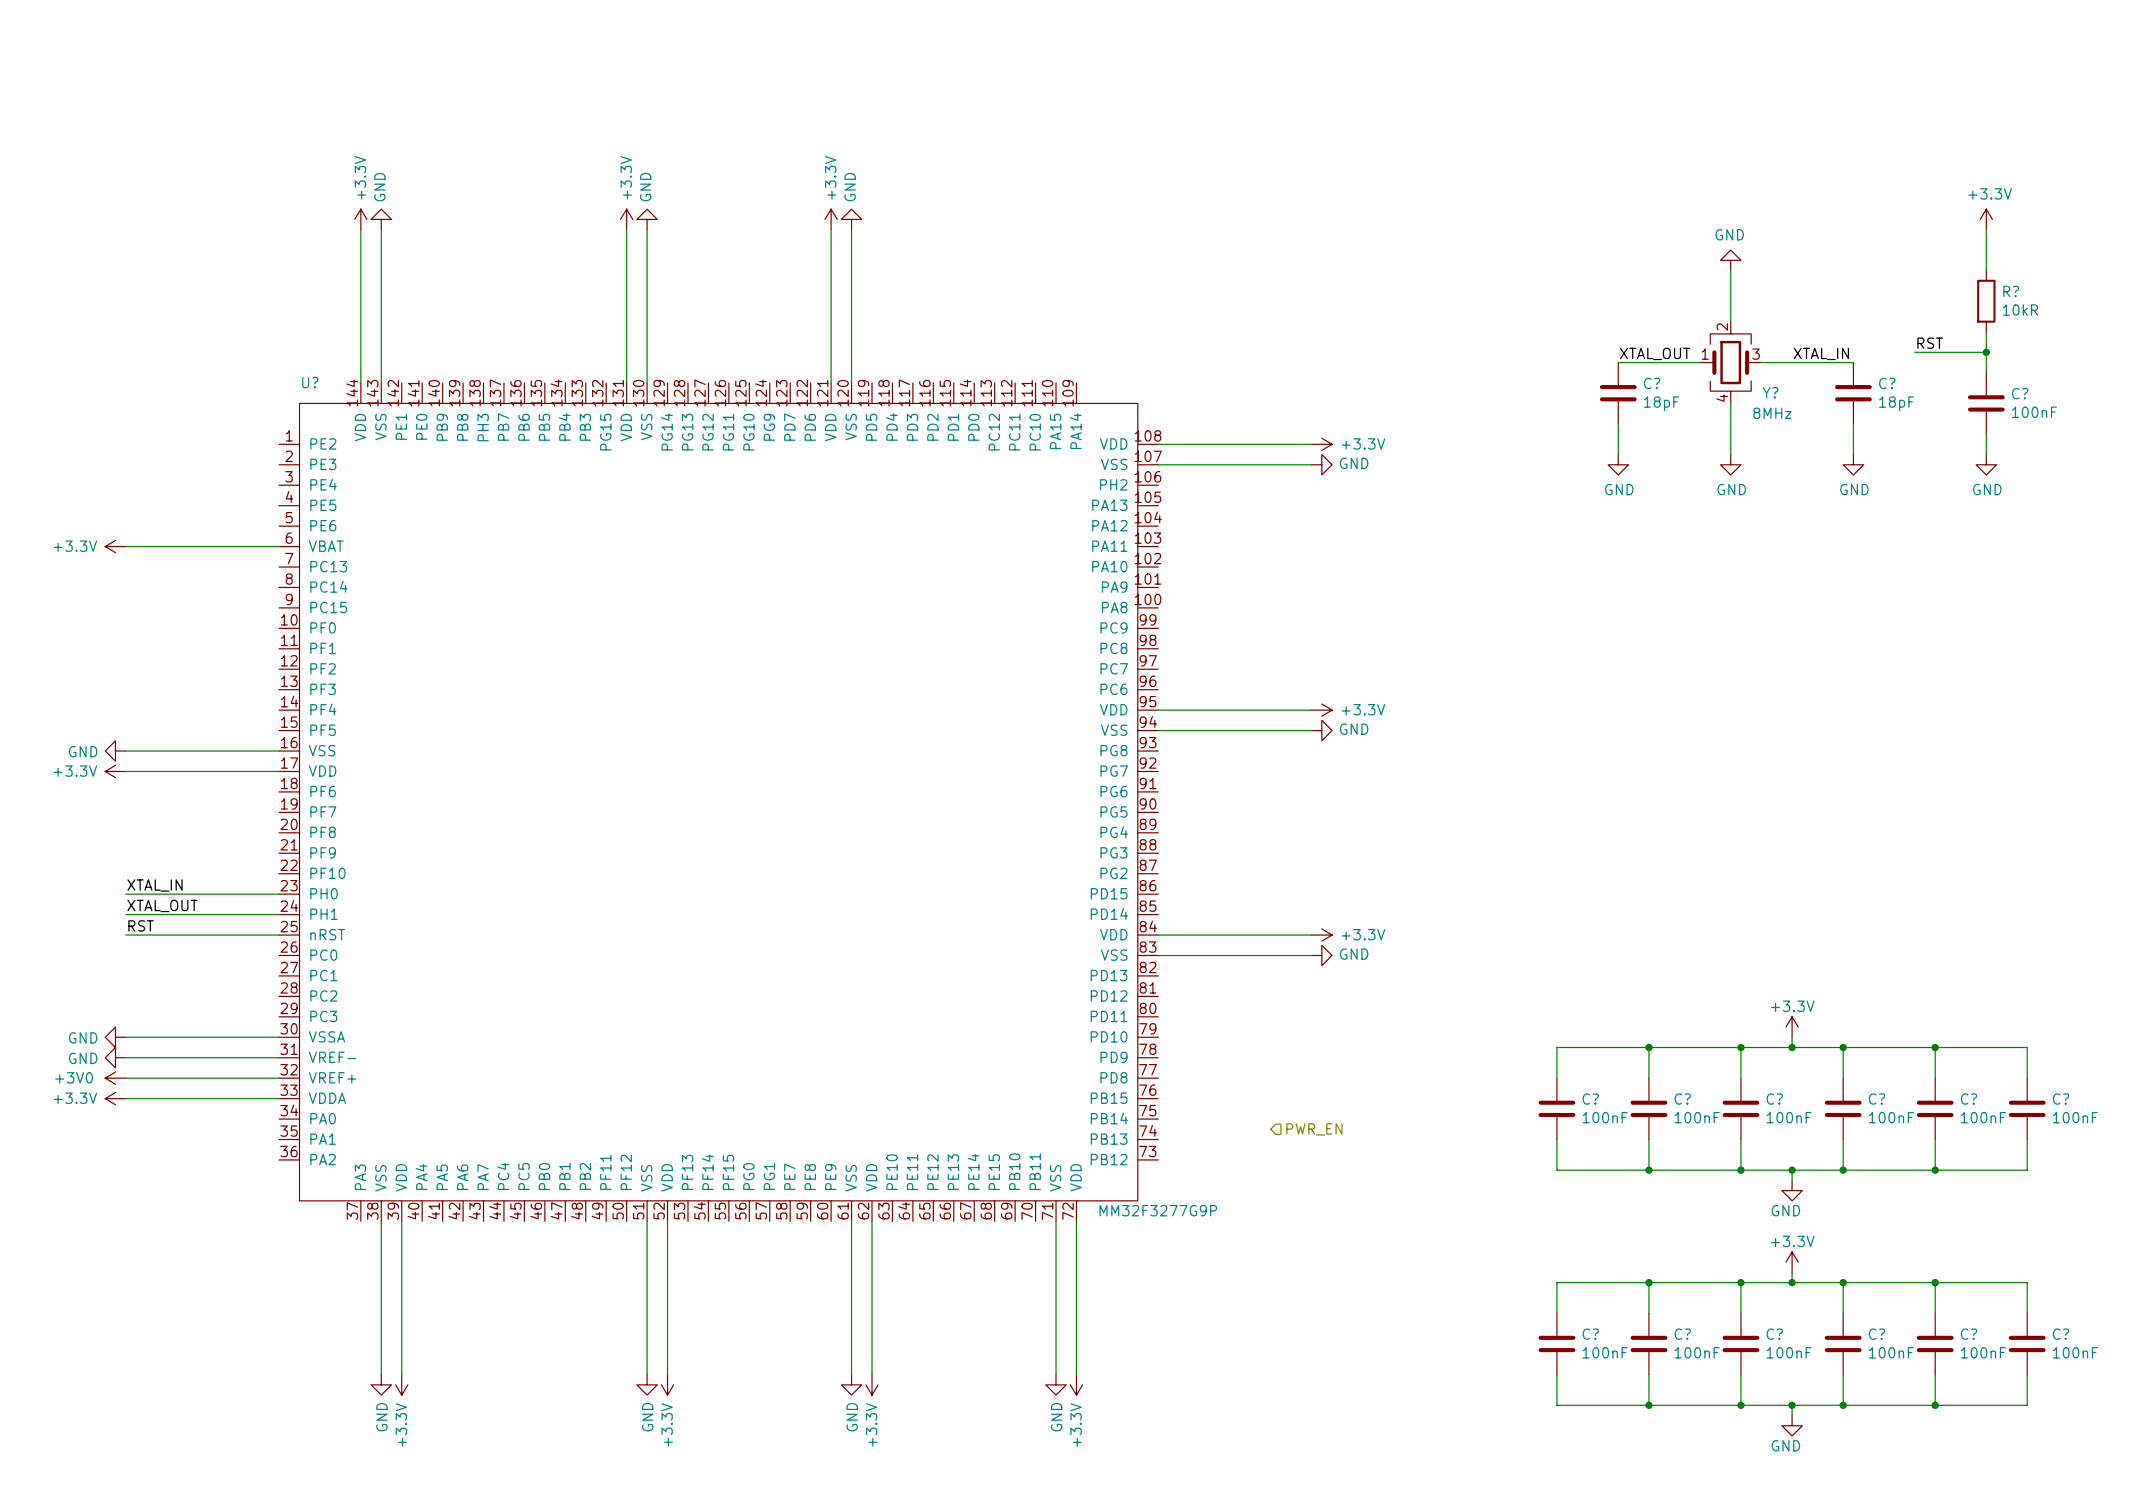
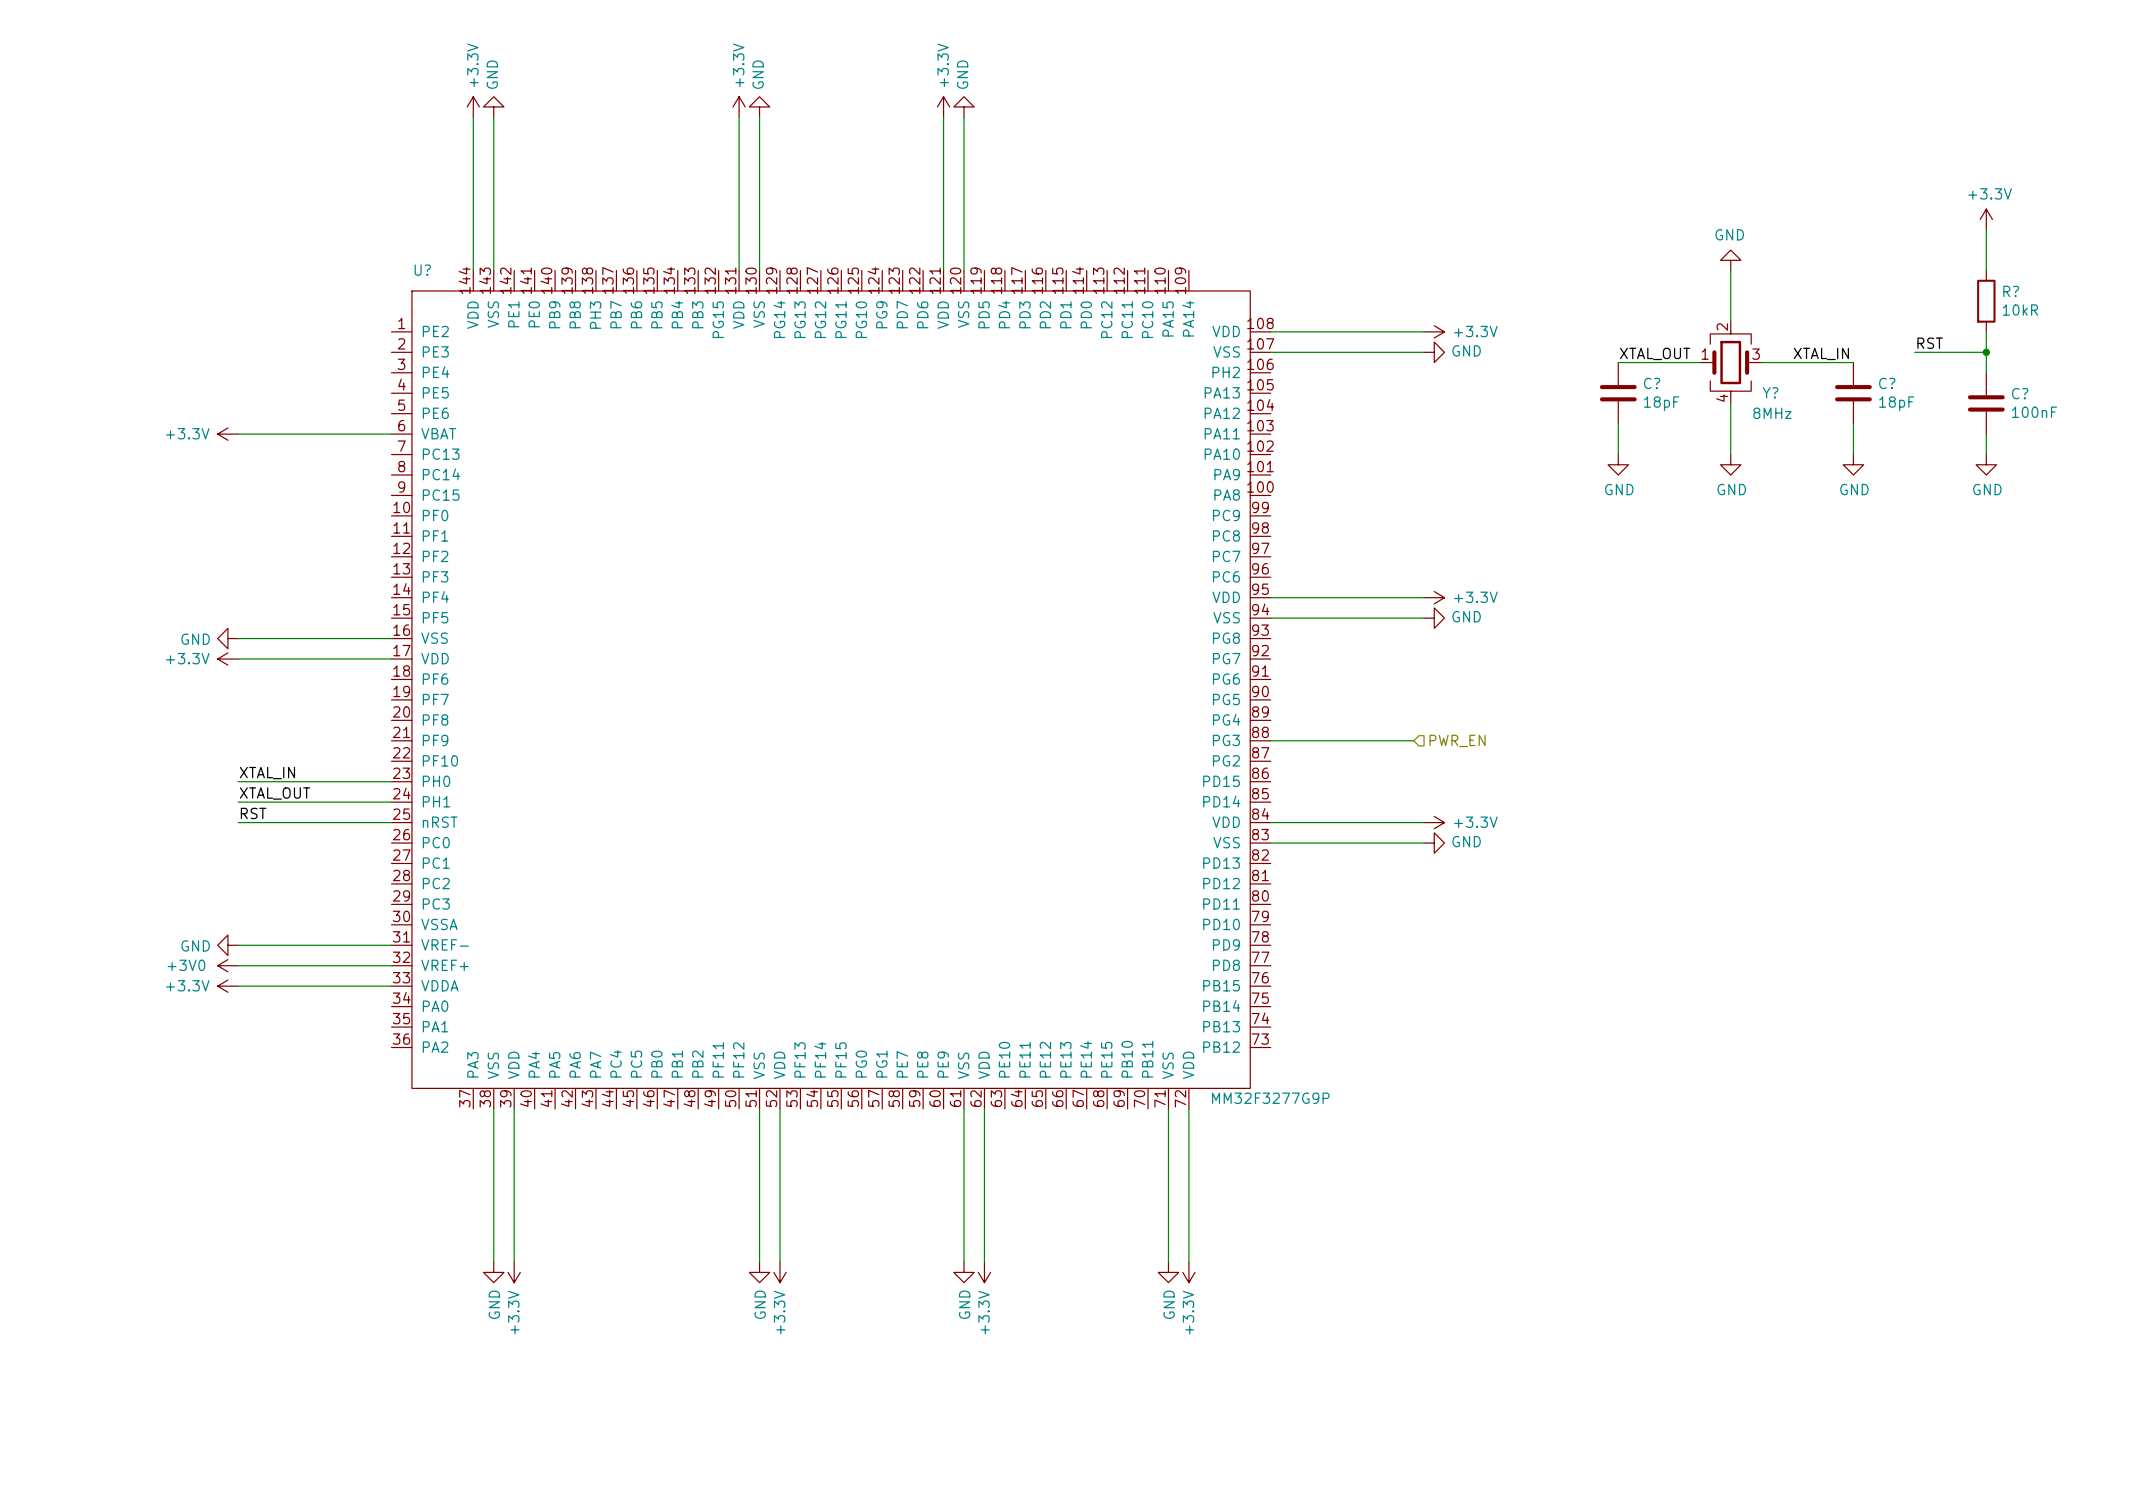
power symbol: none -> +3.3V (473, 106)
power symbol: none -> GND (493, 106)
power symbol: none -> +3.3V (739, 106)
power symbol: none -> GND (759, 106)
power symbol: none -> +3.3V (943, 106)
power symbol: none -> GND (964, 106)
power symbol: +3.3V (360, 219) -> none
power symbol: GND (381, 219) -> none
power symbol: +3.3V (626, 219) -> none
power symbol: GND (647, 219) -> none
power symbol: +3.3V (831, 219) -> none
power symbol: GND (851, 219) -> none
wire: (360, 229) (360, 382) -> (473, 117) (473, 270)
wire: (381, 229) (381, 382) -> (493, 117) (493, 270)
wire: (626, 229) (626, 382) -> (739, 117) (739, 270)
wire: (647, 229) (647, 382) -> (759, 117) (759, 270)
wire: (831, 229) (831, 382) -> (943, 117) (943, 270)
wire: (851, 229) (851, 382) -> (964, 117) (964, 270)
power symbol: none -> +3.3V (1434, 331)
power symbol: none -> GND (1434, 352)
power symbol: none -> +3.3V (227, 434)
wire: (1158, 444) (1311, 444) -> (1270, 331) (1424, 331)
power symbol: +3.3V (1321, 444) -> none
wire: (1158, 464) (1311, 464) -> (1270, 352) (1424, 352)
power symbol: GND (1321, 464) -> none
power symbol: +3.3V (115, 546) -> none
wire: (125, 546) (279, 546) -> (238, 434) (391, 434)
power symbol: none -> +3.3V (1434, 597)
power symbol: none -> GND (1434, 618)
power symbol: none -> GND (227, 638)
power symbol: none -> +3.3V (227, 659)
wire: (1158, 710) (1311, 710) -> (1270, 597) (1424, 597)
power symbol: +3.3V (1321, 710) -> none
wire: (1158, 730) (1311, 730) -> (1270, 618) (1424, 618)
power symbol: GND (1321, 730) -> none
wire: none -> (1270, 740) (1413, 740)
hierarchical label: none -> PWR_EN (1457, 740)
power symbol: GND (115, 751) -> none
wire: (125, 751) (279, 751) -> (238, 638) (391, 638)
power symbol: +3.3V (115, 771) -> none
wire: (125, 771) (279, 771) -> (238, 659) (391, 659)
U? position: (718, 802) -> (831, 689)
power symbol: none -> +3.3V (1434, 822)
power symbol: none -> GND (1434, 843)
label position: XTAL_IN (154, 885) -> XTAL_IN (267, 773)
wire: (125, 894) (279, 894) -> (238, 781) (391, 781)
label position: XTAL_OUT (162, 905) -> XTAL_OUT (274, 793)
wire: (125, 914) (279, 914) -> (238, 802) (391, 802)
label position: RST (141, 925) -> RST (253, 813)
wire: (125, 935) (279, 935) -> (238, 822) (391, 822)
wire: (1158, 935) (1311, 935) -> (1270, 822) (1424, 822)
power symbol: +3.3V (1321, 935) -> none
power symbol: none -> GND (227, 945)
wire: (1158, 955) (1311, 955) -> (1270, 843) (1424, 843)
power symbol: GND (1321, 955) -> none
power symbol: none -> +3.3V (227, 986)
power symbol: +3.3V (1792, 1027) -> none
power symbol: GND (115, 1037) -> none
wire: (125, 1037) (279, 1037) -> none
wire: (1792, 1037) (1792, 1047) -> none
wire: (1648, 1047) (1648, 1078) -> none
junction: (1648, 1047) -> none
wire: (1740, 1047) (1740, 1078) -> none
junction: (1740, 1047) -> none
junction: (1792, 1047) -> none
wire: (1843, 1047) (1843, 1078) -> none
junction: (1843, 1047) -> none
wire: (1935, 1047) (1935, 1078) -> none
junction: (1935, 1047) -> none
power symbol: GND (115, 1057) -> none
wire: (125, 1057) (279, 1057) -> (238, 945) (391, 945)
power symbol position: +3V0 (115, 1078) -> +3V0 (227, 965)
wire: (125, 1078) (279, 1078) -> (238, 965) (391, 965)
wire: (1556, 1078) (1556, 1047) (2027, 1047) (2027, 1078) -> none
power symbol: +3.3V (115, 1098) -> none
wire: (125, 1098) (279, 1098) -> (238, 986) (391, 986)
C?: 100nF (1556, 1108) -> none
C?: 100nF (1648, 1108) -> none
C?: 100nF (1740, 1108) -> none
C?: 100nF (1843, 1108) -> none
C?: 100nF (1935, 1108) -> none
C?: 100nF (2027, 1108) -> none
hierarchical label: PWR_EN (1314, 1129) -> none
wire: (1556, 1139) (1556, 1170) (2027, 1170) (2027, 1139) -> none
wire: (1648, 1139) (1648, 1170) -> none
wire: (1740, 1139) (1740, 1170) -> none
wire: (1843, 1139) (1843, 1170) -> none
wire: (1935, 1139) (1935, 1170) -> none
junction: (1648, 1170) -> none
junction: (1740, 1170) -> none
wire: (1792, 1170) (1792, 1180) -> none
junction: (1792, 1170) -> none
junction: (1843, 1170) -> none
junction: (1935, 1170) -> none
power symbol: GND (1792, 1190) -> none
wire: (381, 1221) (381, 1374) -> (493, 1108) (493, 1262)
wire: (401, 1221) (401, 1374) -> (514, 1108) (514, 1262)
wire: (647, 1221) (647, 1374) -> (759, 1108) (759, 1262)
wire: (667, 1221) (667, 1374) -> (779, 1108) (779, 1262)
wire: (851, 1221) (851, 1374) -> (964, 1108) (964, 1262)
wire: (871, 1221) (871, 1374) -> (984, 1108) (984, 1262)
wire: (1056, 1221) (1056, 1374) -> (1168, 1108) (1168, 1262)
wire: (1076, 1221) (1076, 1374) -> (1188, 1108) (1188, 1262)
power symbol: +3.3V (1792, 1262) -> none
power symbol: none -> GND (493, 1272)
power symbol: none -> +3.3V (514, 1272)
power symbol: none -> GND (759, 1272)
power symbol: none -> +3.3V (779, 1272)
power symbol: none -> GND (964, 1272)
power symbol: none -> +3.3V (984, 1272)
power symbol: none -> GND (1168, 1272)
power symbol: none -> +3.3V (1188, 1272)
wire: (1792, 1272) (1792, 1282) -> none
wire: (1648, 1282) (1648, 1313) -> none
junction: (1648, 1282) -> none
wire: (1740, 1282) (1740, 1313) -> none
junction: (1740, 1282) -> none
junction: (1792, 1282) -> none
wire: (1843, 1282) (1843, 1313) -> none
junction: (1843, 1282) -> none
wire: (1935, 1282) (1935, 1313) -> none
junction: (1935, 1282) -> none
wire: (1556, 1313) (1556, 1282) (2027, 1282) (2027, 1313) -> none
C?: 100nF (1556, 1343) -> none
C?: 100nF (1648, 1343) -> none
C?: 100nF (1740, 1343) -> none
C?: 100nF (1843, 1343) -> none
C?: 100nF (1935, 1343) -> none
C?: 100nF (2027, 1343) -> none
wire: (1556, 1374) (1556, 1405) (2027, 1405) (2027, 1374) -> none
wire: (1648, 1374) (1648, 1405) -> none
wire: (1740, 1374) (1740, 1405) -> none
wire: (1843, 1374) (1843, 1405) -> none
wire: (1935, 1374) (1935, 1405) -> none
power symbol: GND (381, 1384) -> none
power symbol: +3.3V (401, 1384) -> none
power symbol: GND (647, 1384) -> none
power symbol: +3.3V (667, 1384) -> none
power symbol: GND (851, 1384) -> none
power symbol: +3.3V (871, 1384) -> none
power symbol: GND (1056, 1384) -> none
power symbol: +3.3V (1076, 1384) -> none
junction: (1648, 1405) -> none
junction: (1740, 1405) -> none
wire: (1792, 1405) (1792, 1415) -> none
junction: (1792, 1405) -> none
junction: (1843, 1405) -> none
junction: (1935, 1405) -> none
power symbol: GND (1792, 1425) -> none

